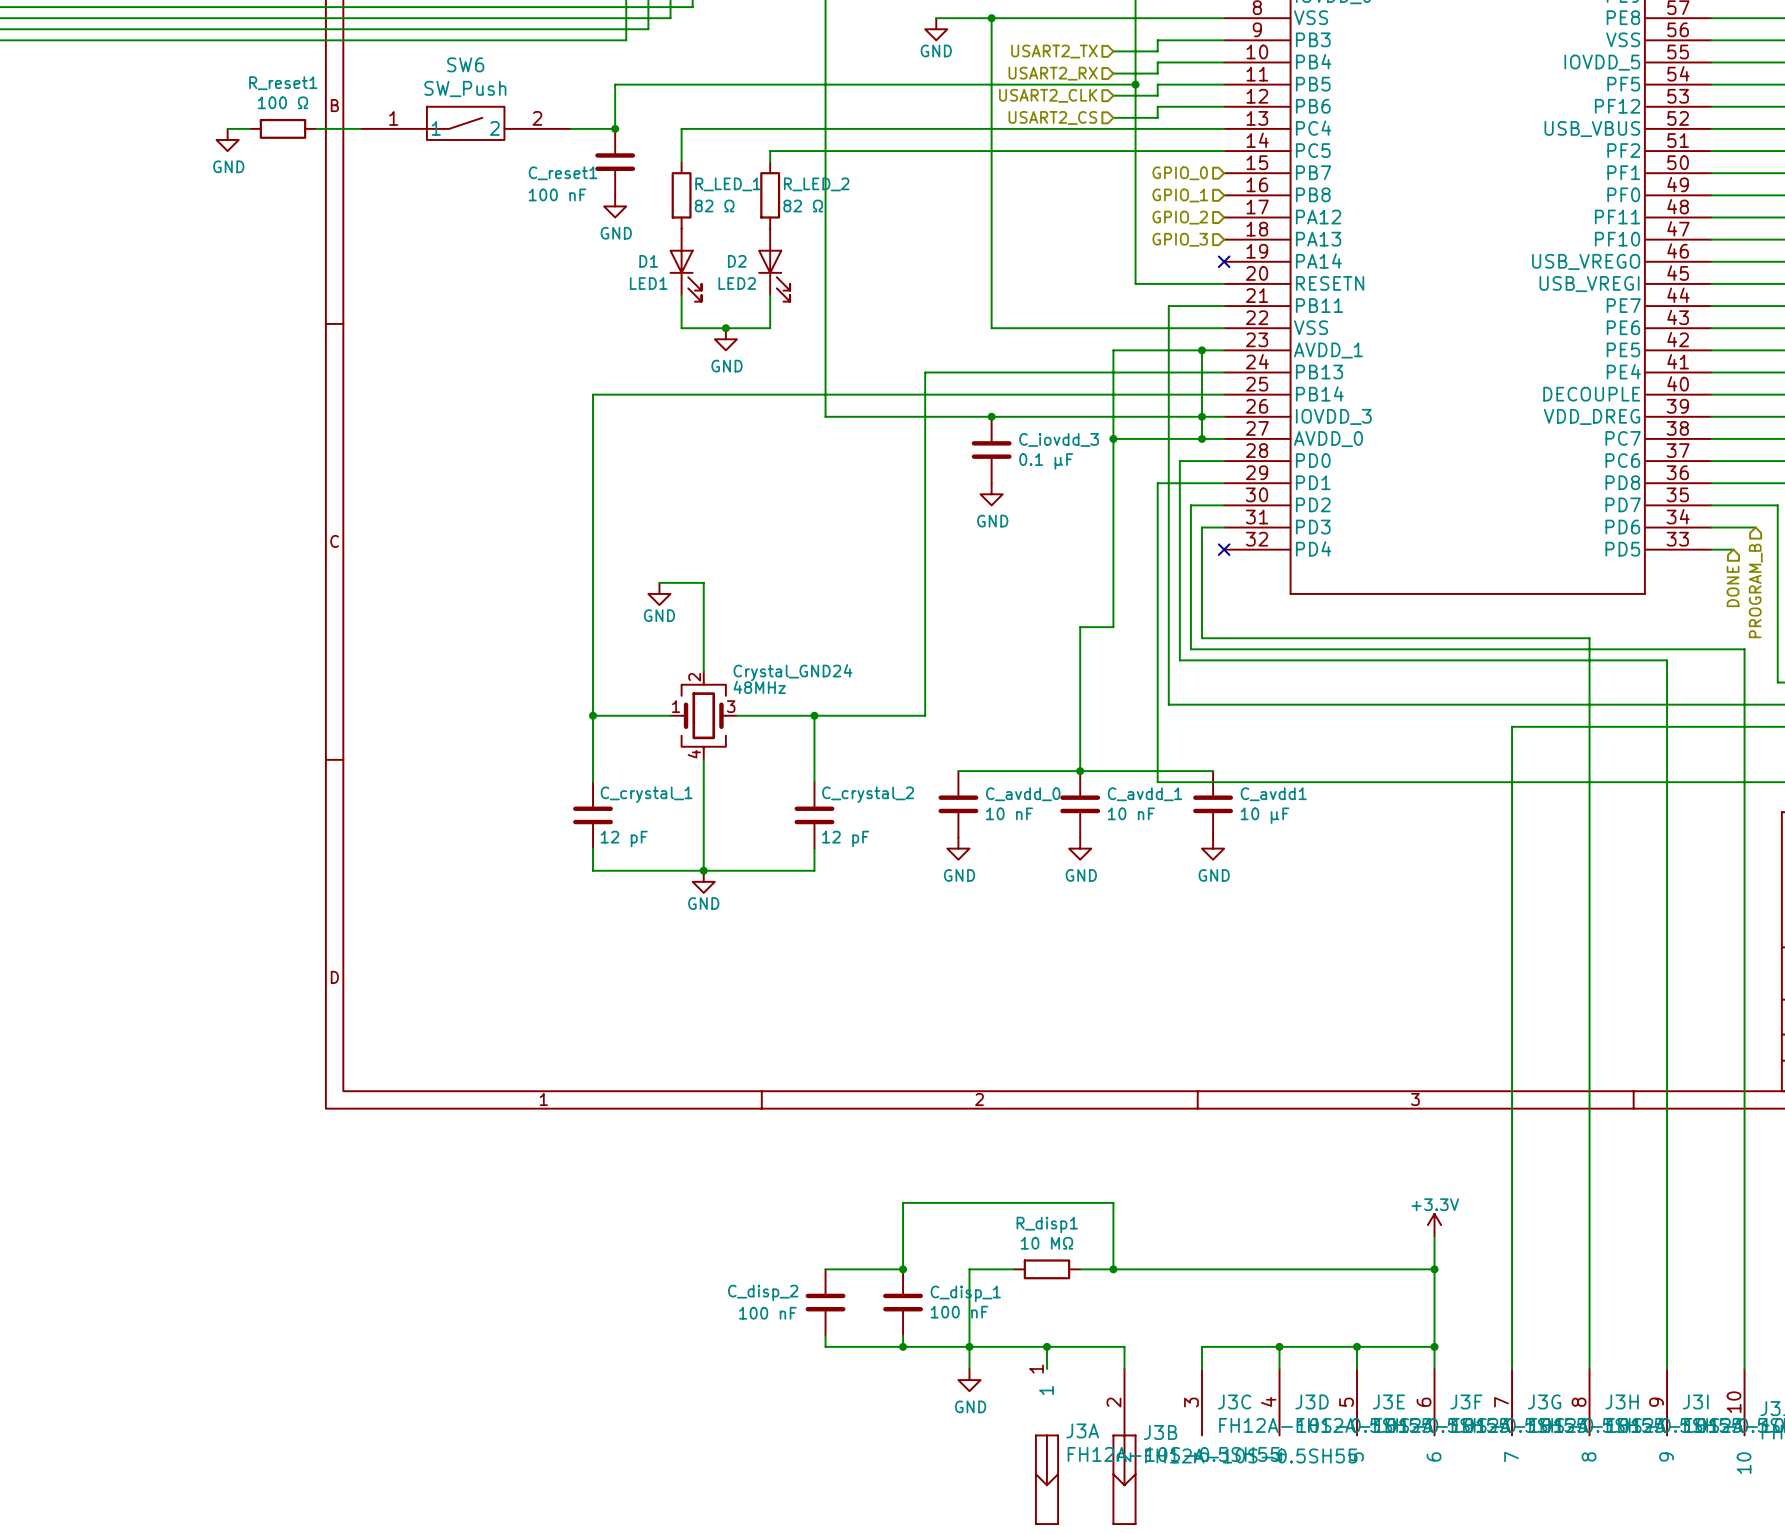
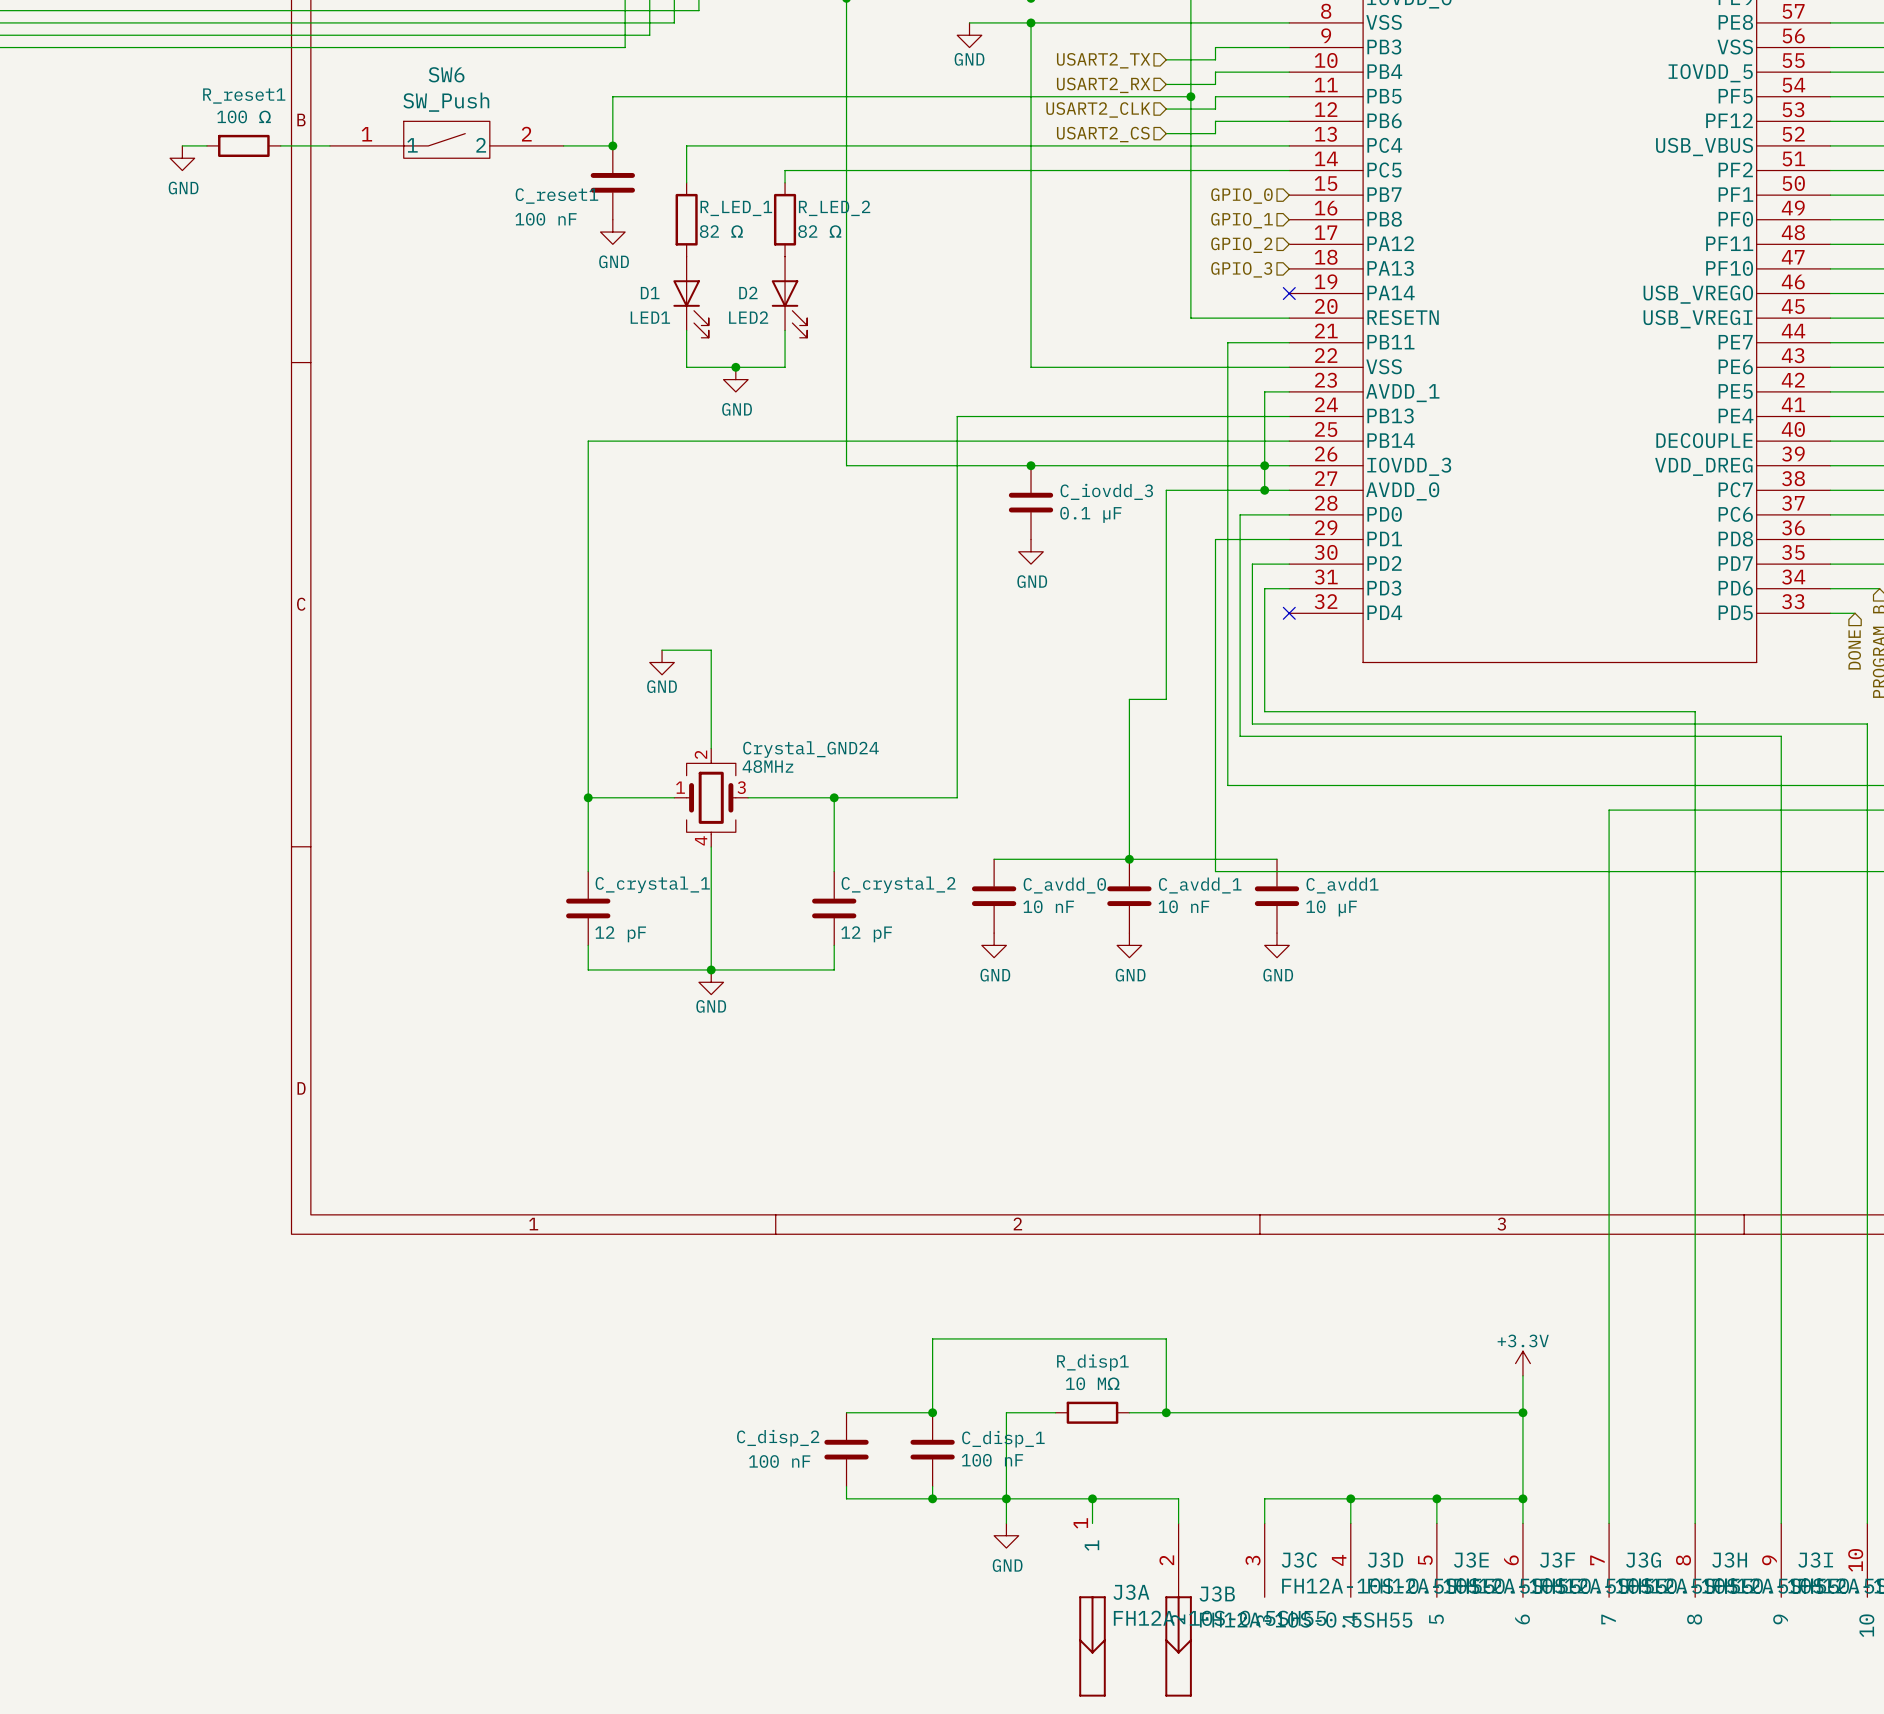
wire: (1202, 350) (1113, 350) (1113, 438) -> none
junction: (1202, 350) -> none
junction: (1113, 438) -> none

